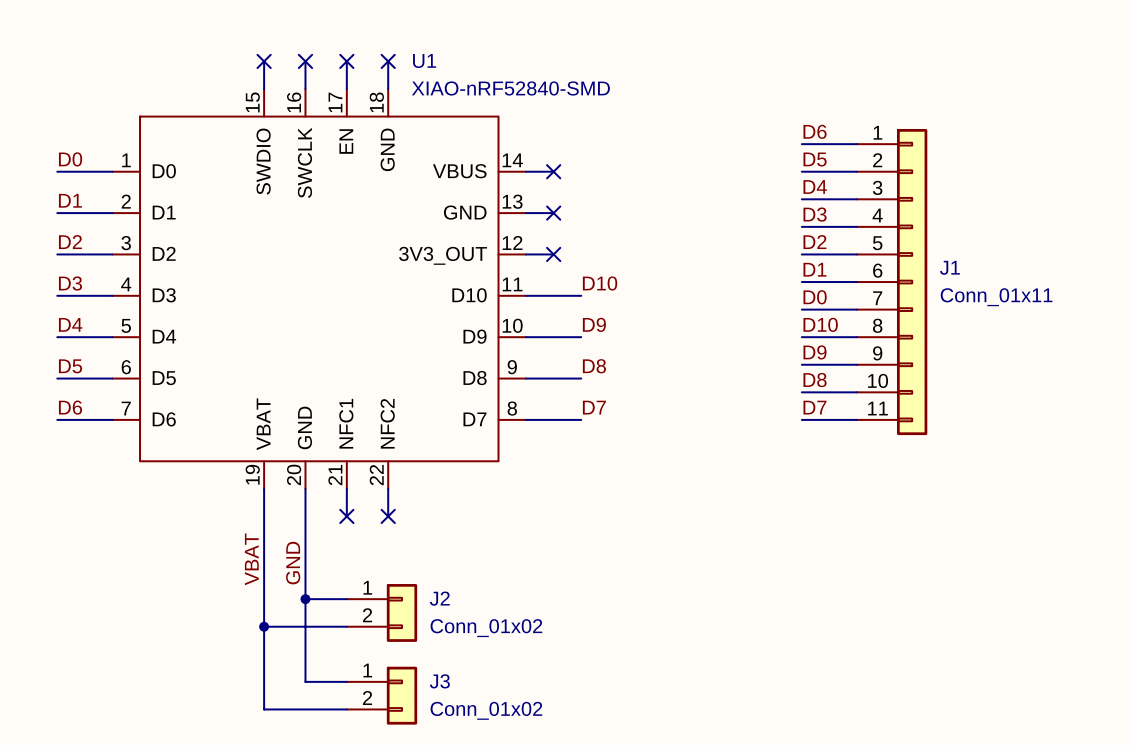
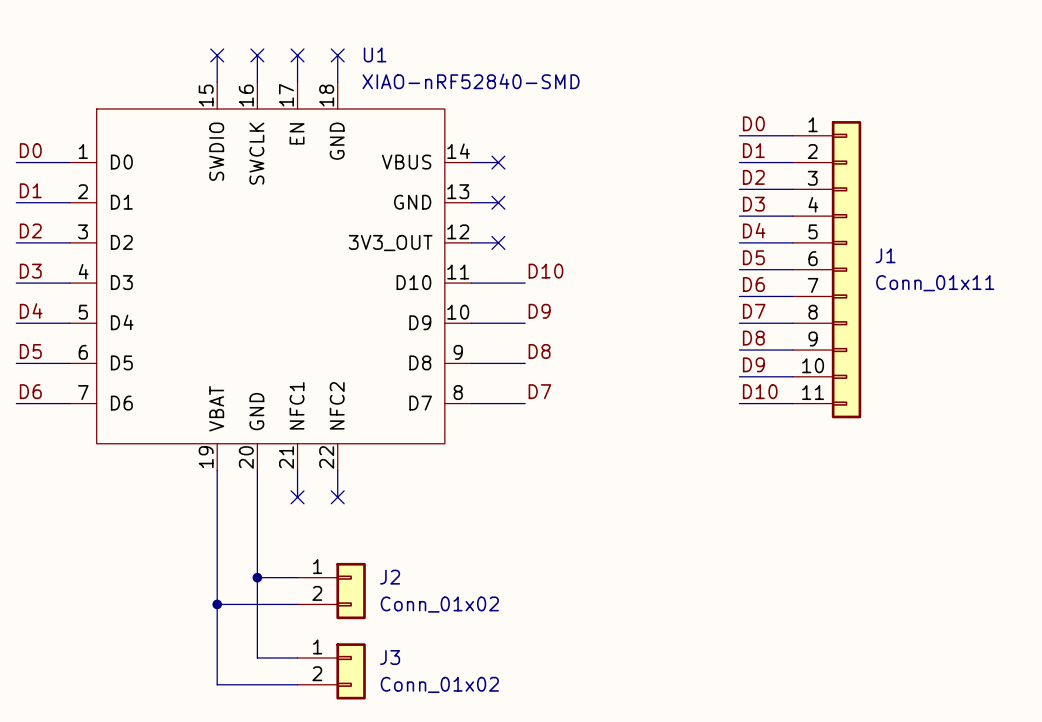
label: D6 (815, 131) -> D0 (753, 123)
label: D5 (815, 159) -> D1 (753, 150)
label: D4 (815, 187) -> D2 (753, 177)
label: D2 (814, 242) -> D4 (754, 230)
label: D1 (814, 269) -> D5 (753, 257)
label: D0 (815, 297) -> D6 (753, 284)
label: D10 (820, 324) -> D7 (754, 311)
label: D9 (815, 352) -> D8 (753, 338)
label: D8 (815, 380) -> D9 (753, 364)
label: D7 (814, 407) -> D10 (760, 391)
label: VBAT (251, 559) -> none
label: GND (293, 563) -> none

